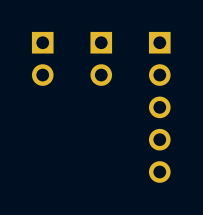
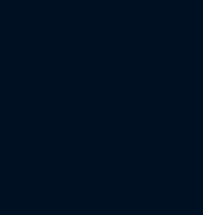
part: (42, 58) -> none
part: (101, 58) -> none
part: (159, 107) -> none

